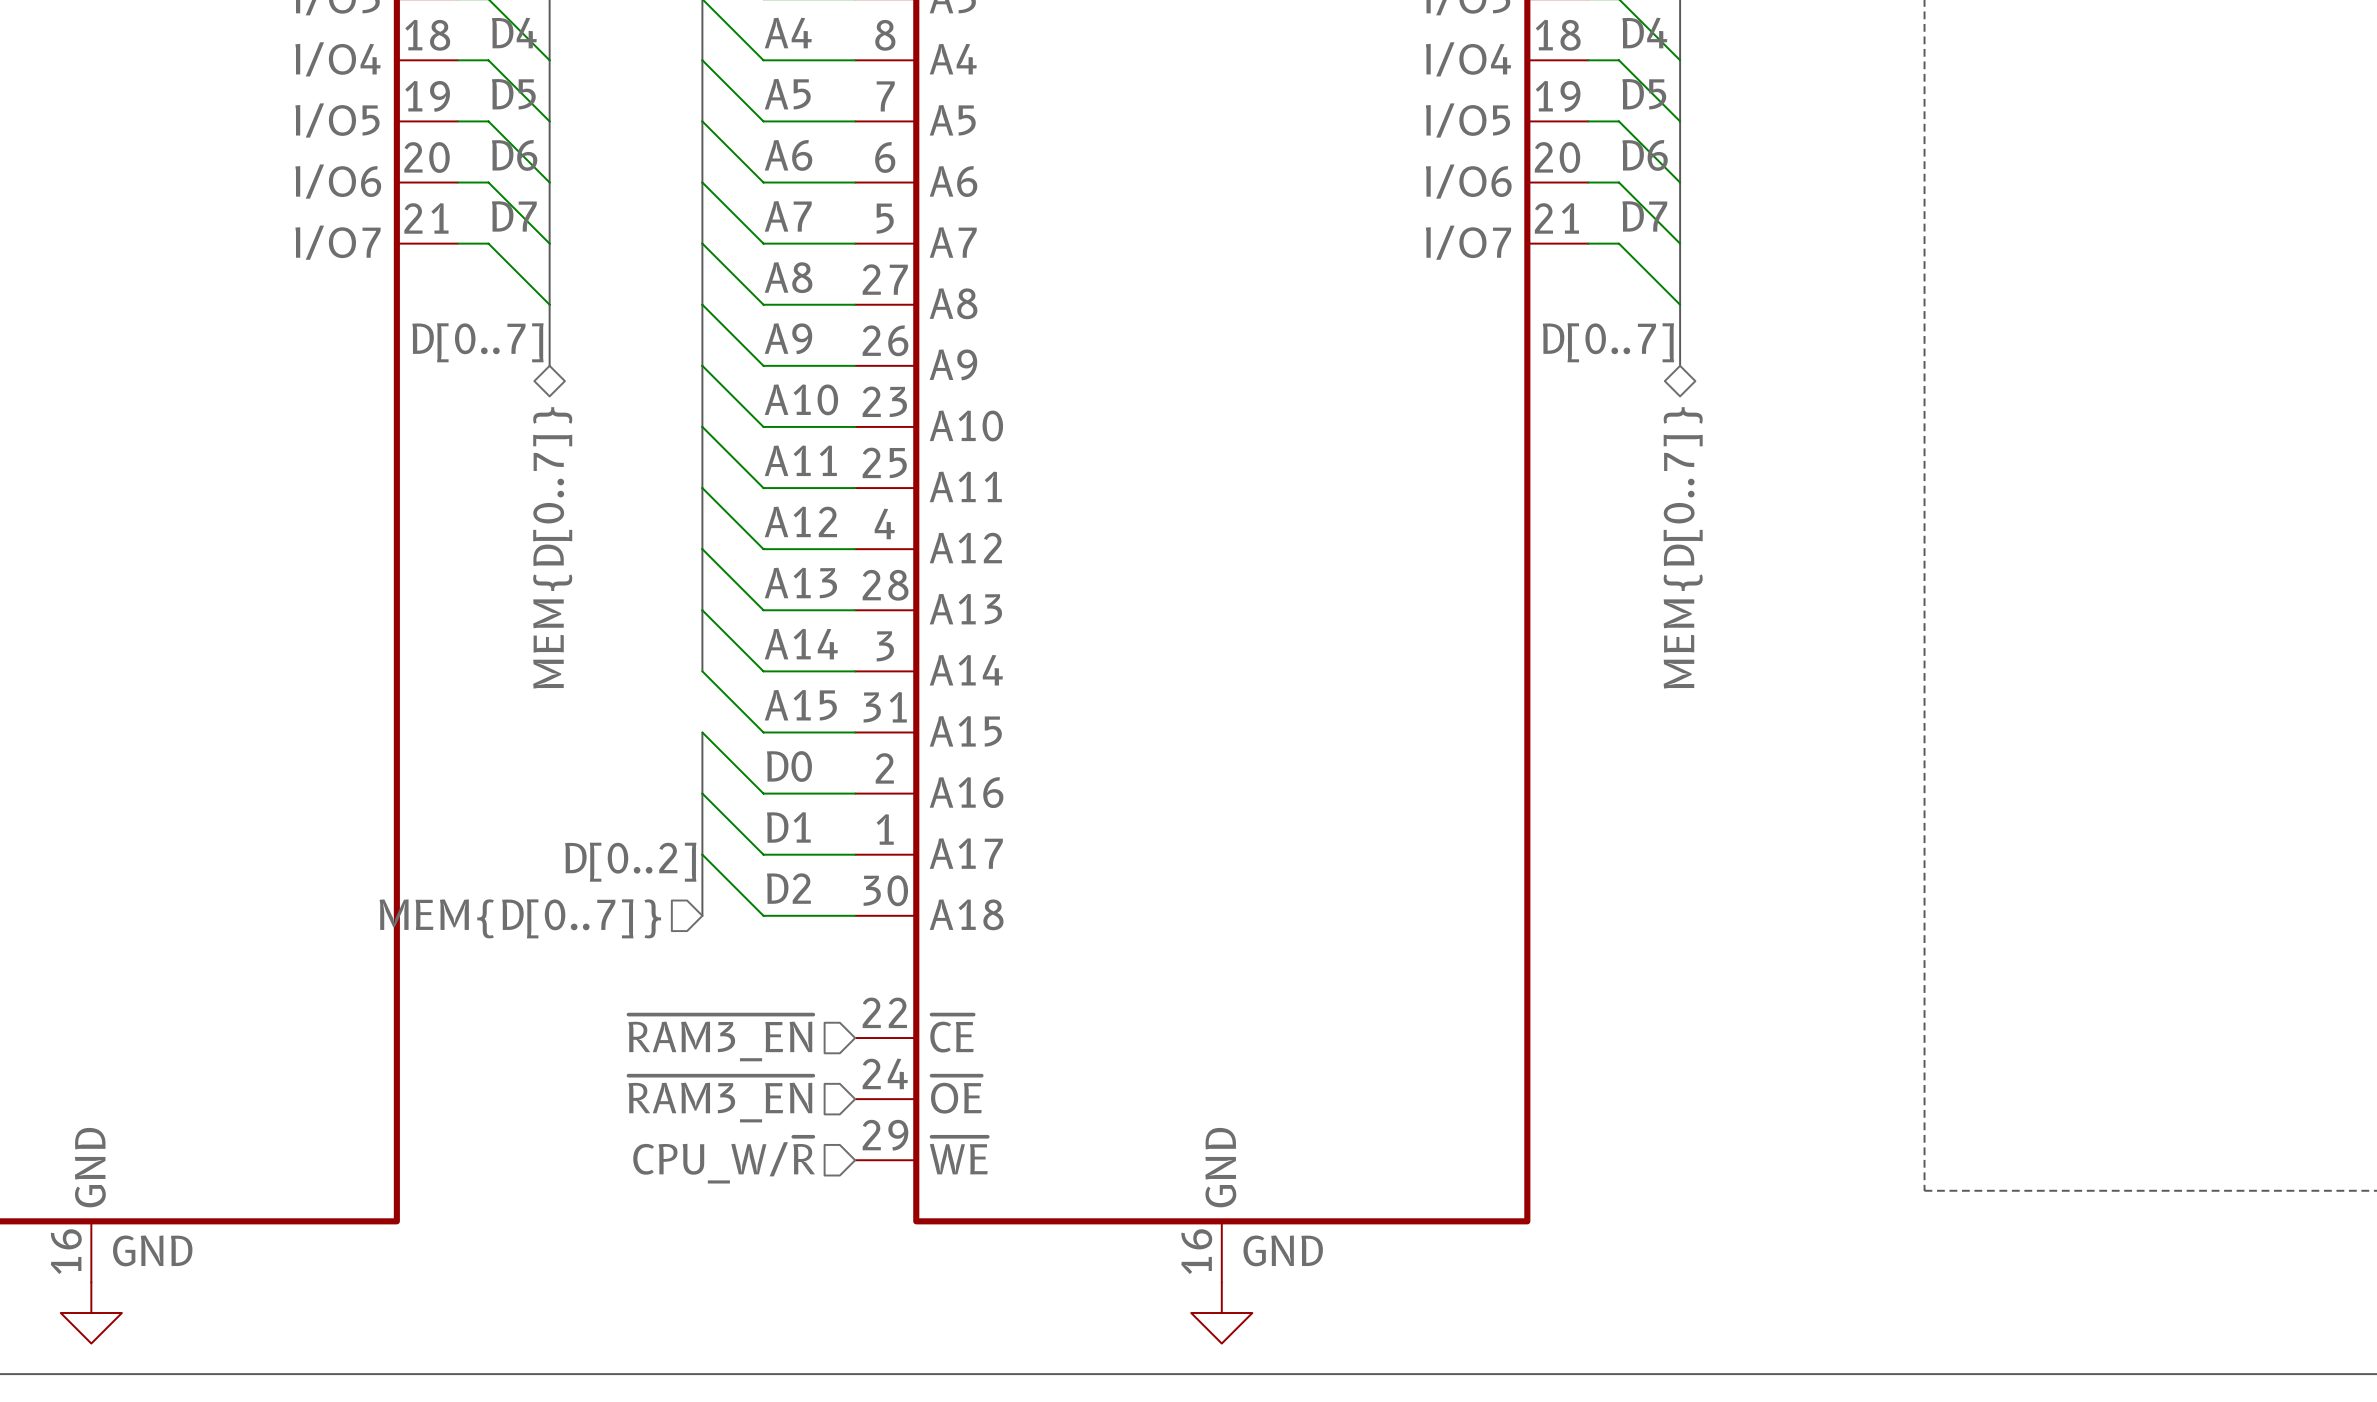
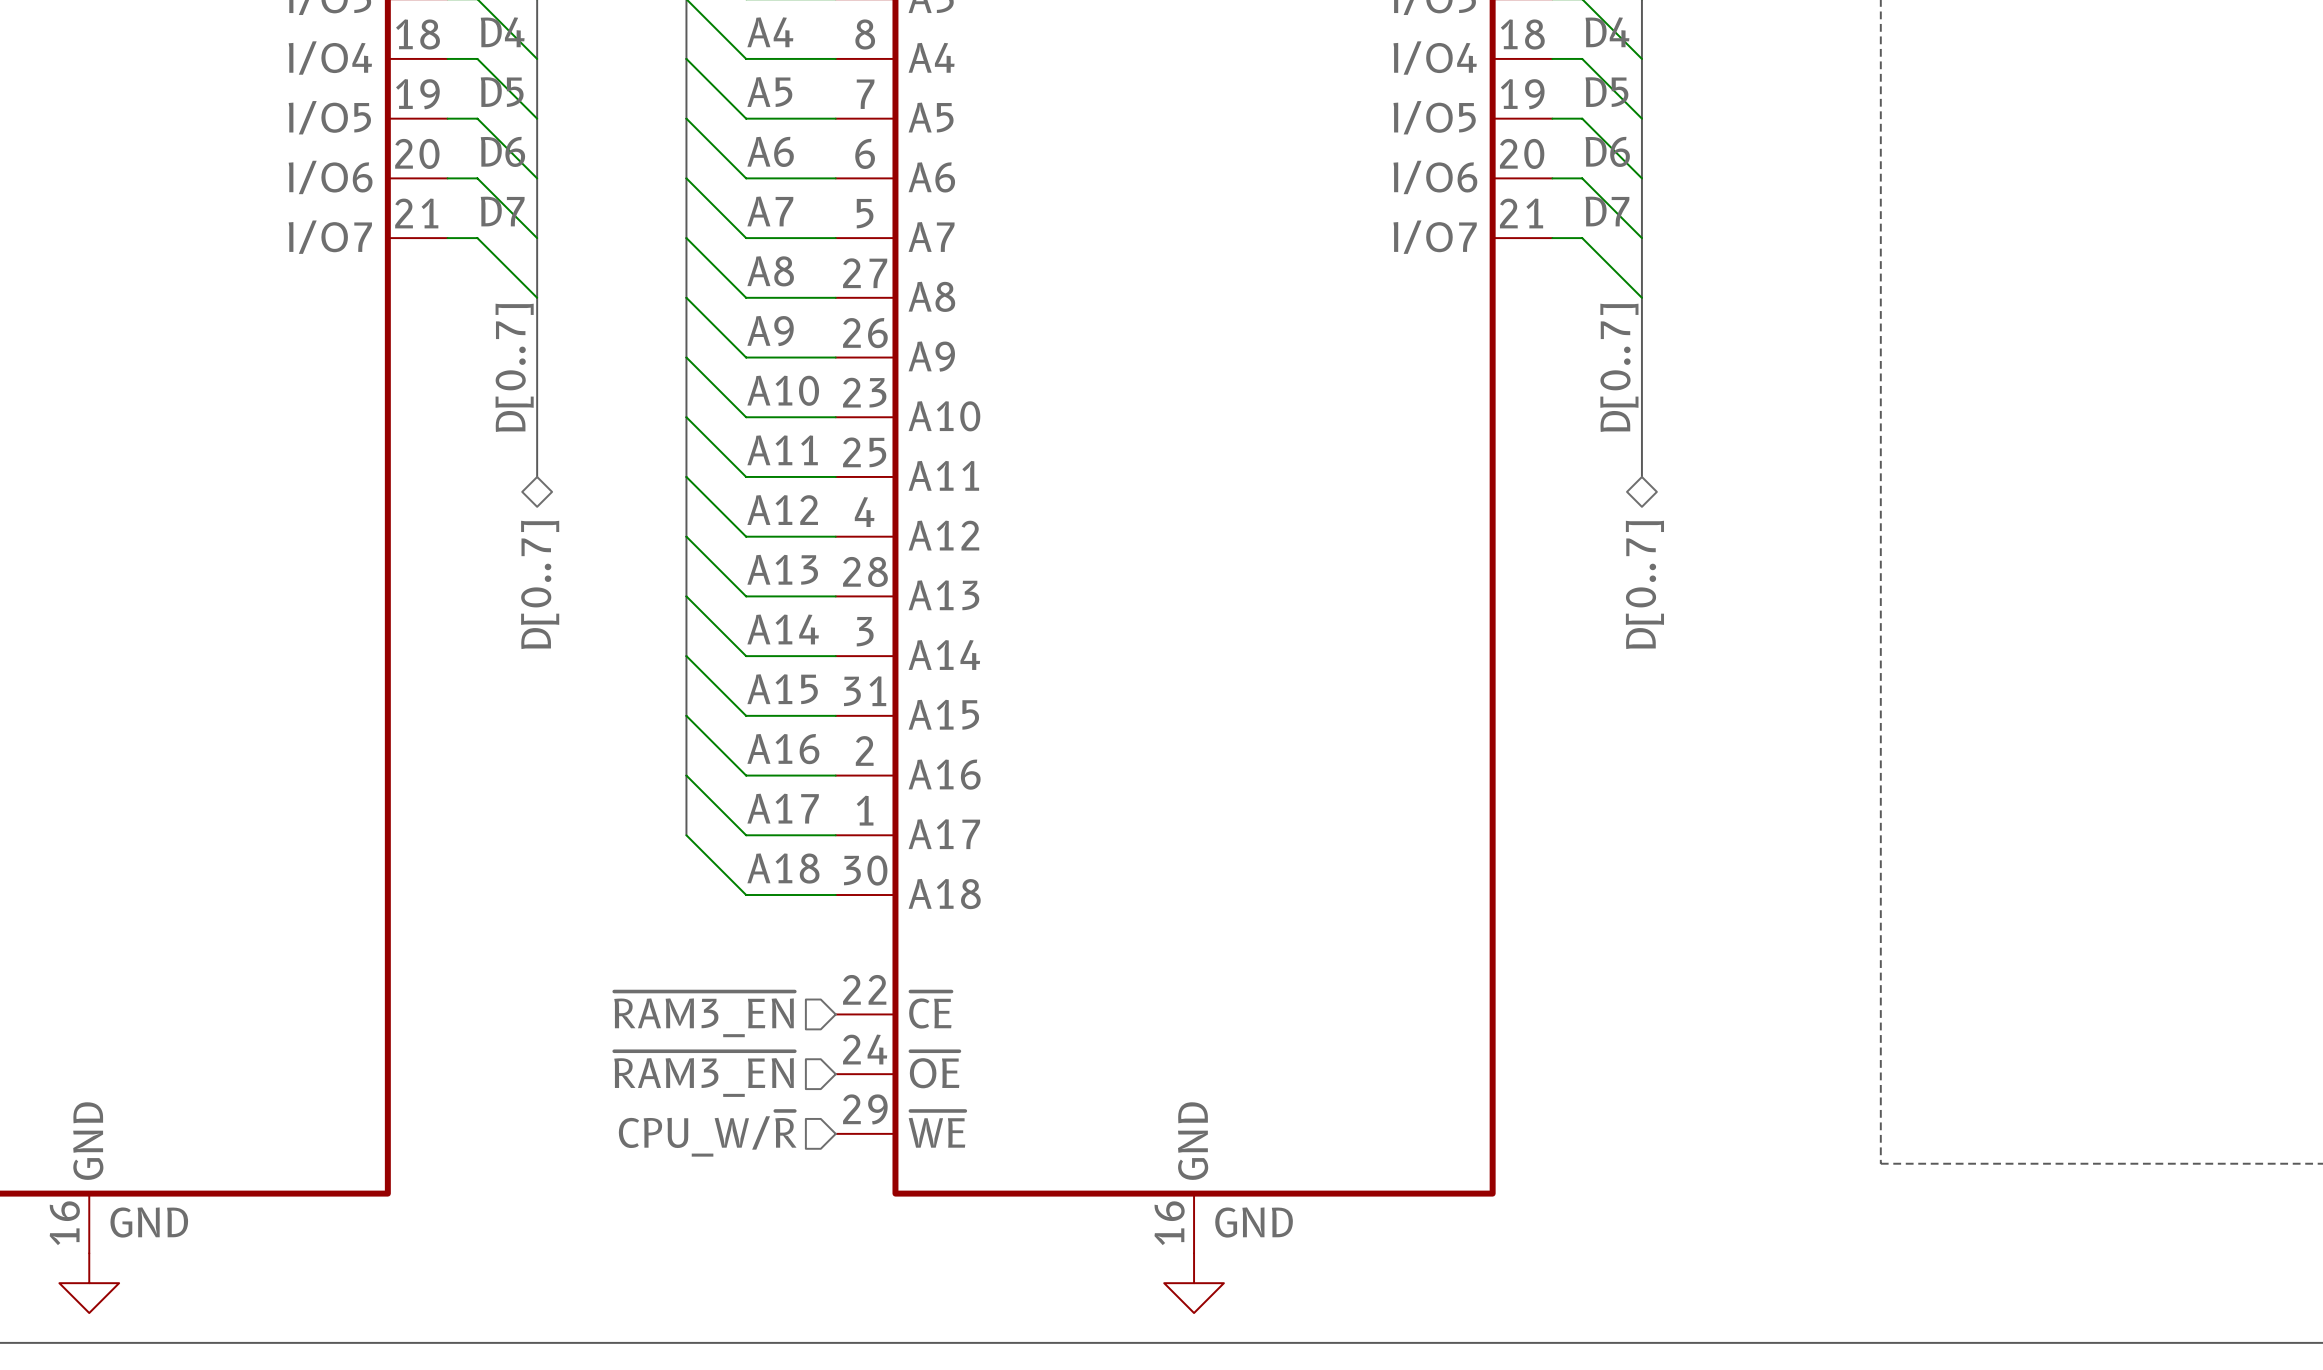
label rotation: 0° (477, 342) -> 90° counterclockwise (514, 367)
label rotation: 0° (1608, 342) -> 90° counterclockwise (1619, 367)
bus: none -> (537, 357) (537, 476)
bus: none -> (1641, 357) (1641, 476)
hierarchical label: MEM{D[0..7]} (552, 547) -> D[0..7] (540, 584)
hierarchical label: MEM{D[0..7]} (1683, 547) -> D[0..7] (1644, 584)
label: D0 (789, 766) -> A16 (783, 749)
label: D1 (788, 827) -> A17 (783, 808)
bus: (702, 854) (702, 915) -> (686, 656) (686, 715)
label: D[0..2] (630, 862) -> none
label: D2 (788, 888) -> A18 (783, 868)
hierarchical label: MEM{D[0..7]} (520, 918) -> none

